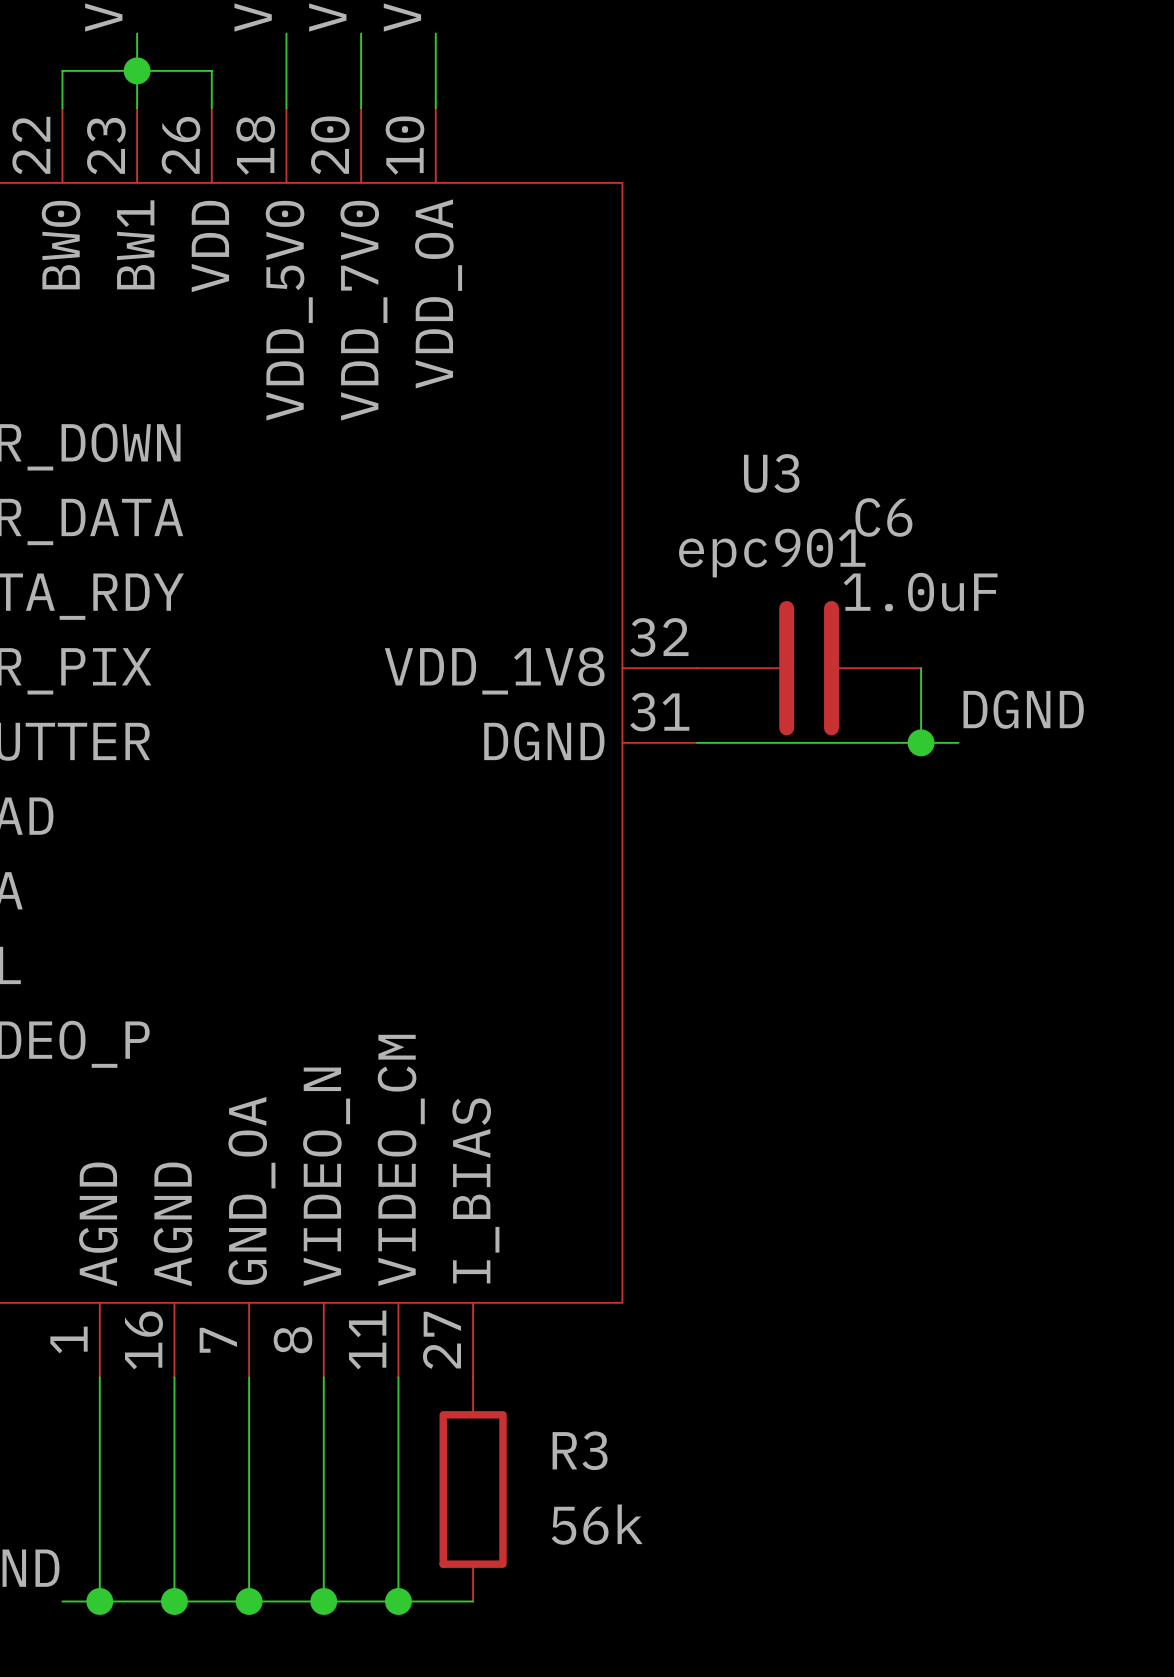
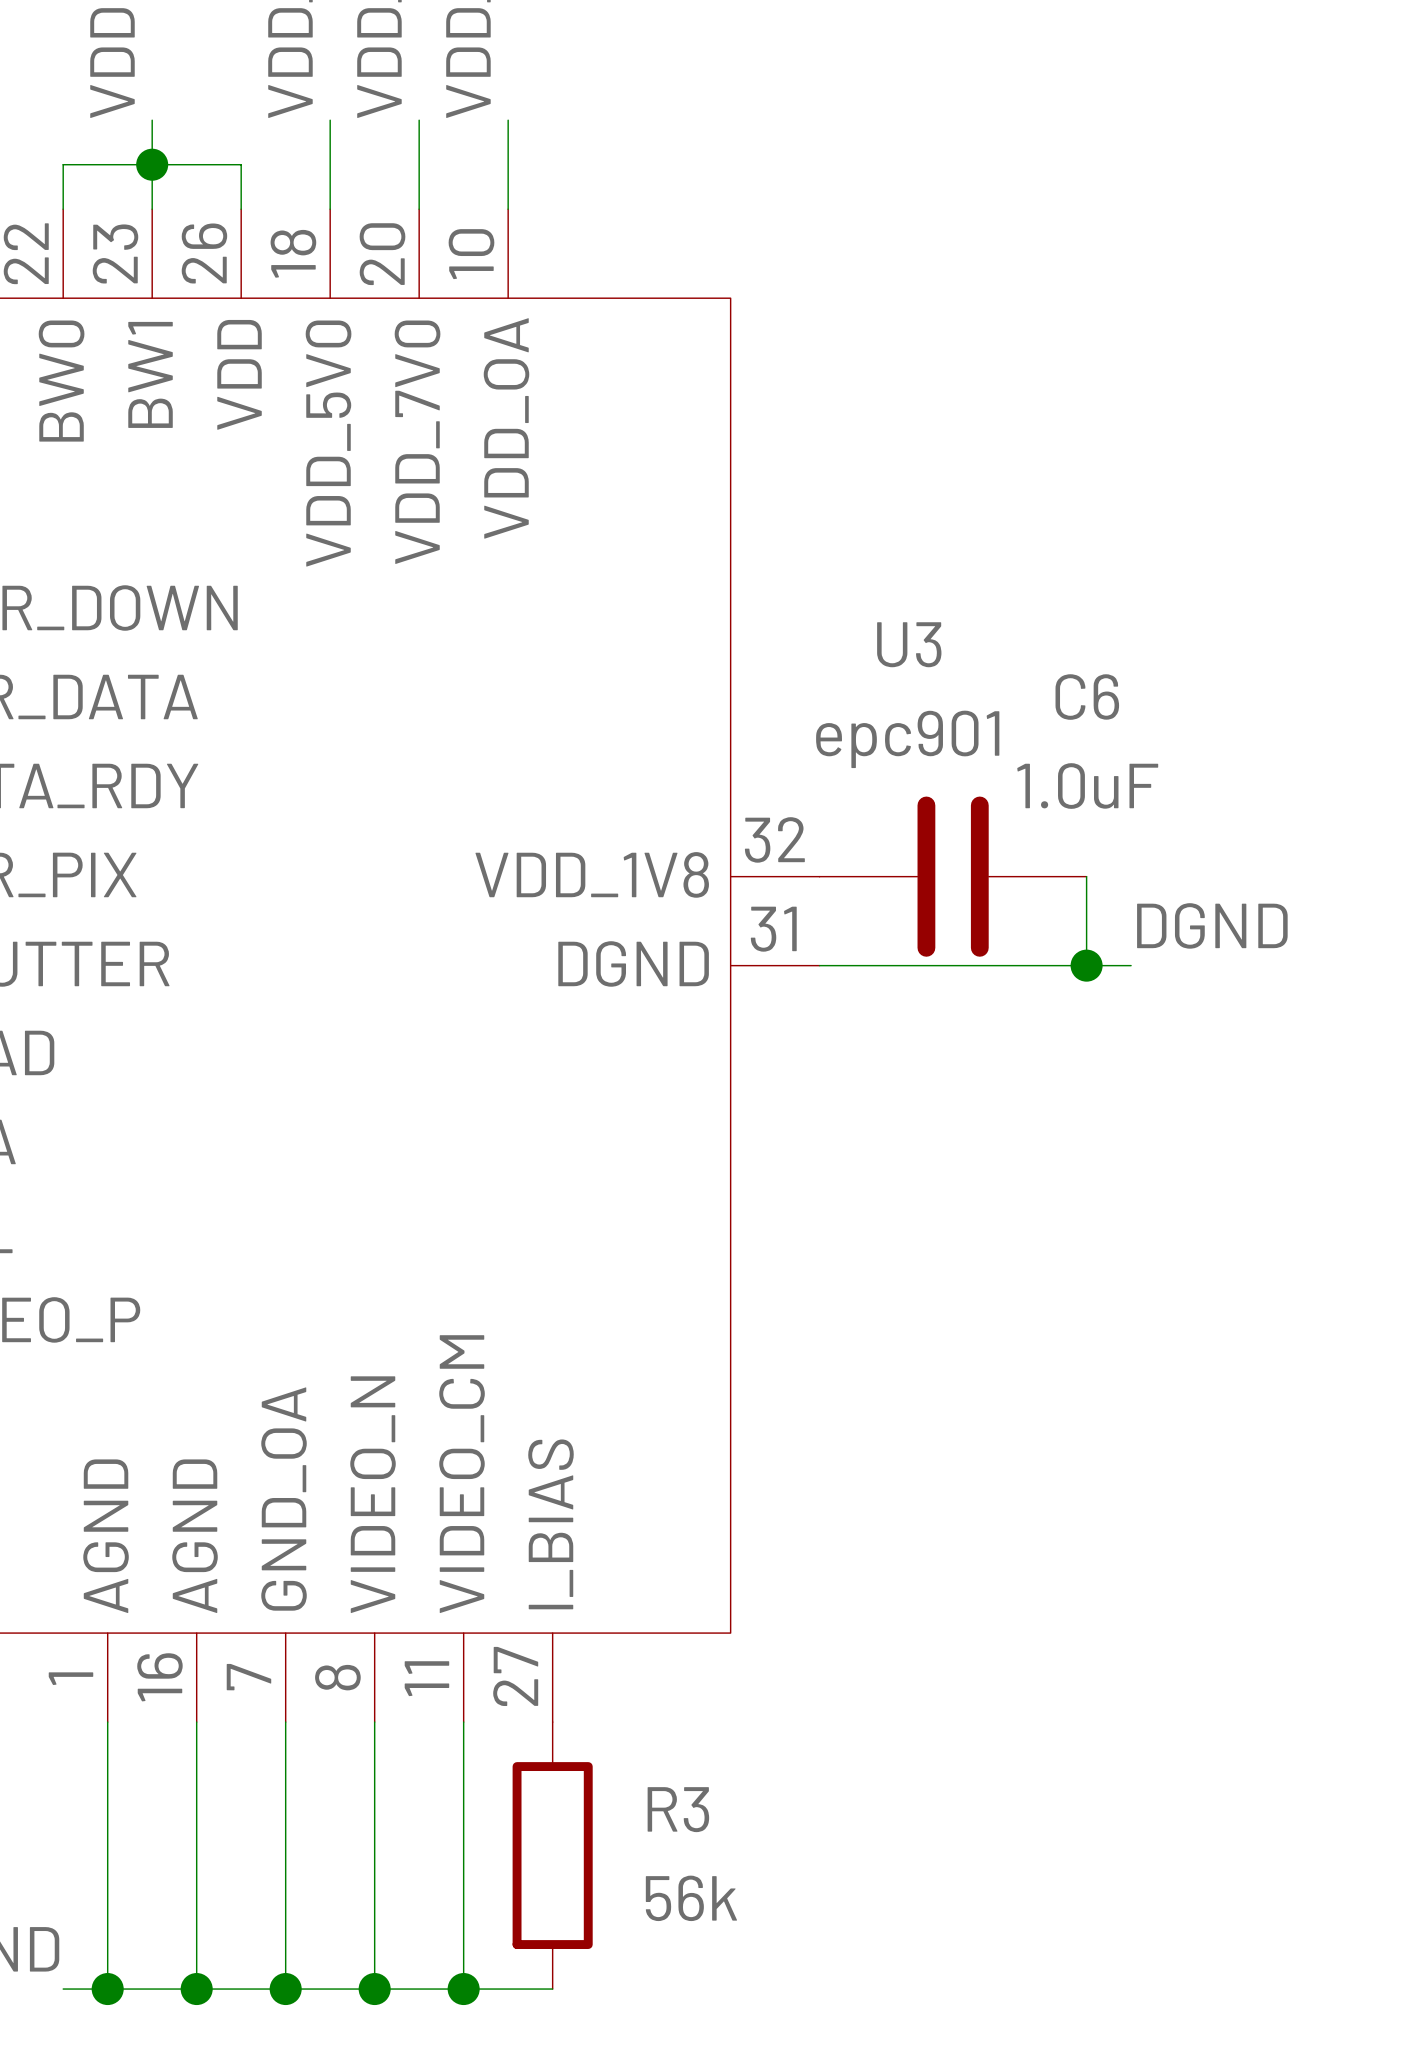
C6 name position: C6 (883, 517) -> C6 (1087, 697)

